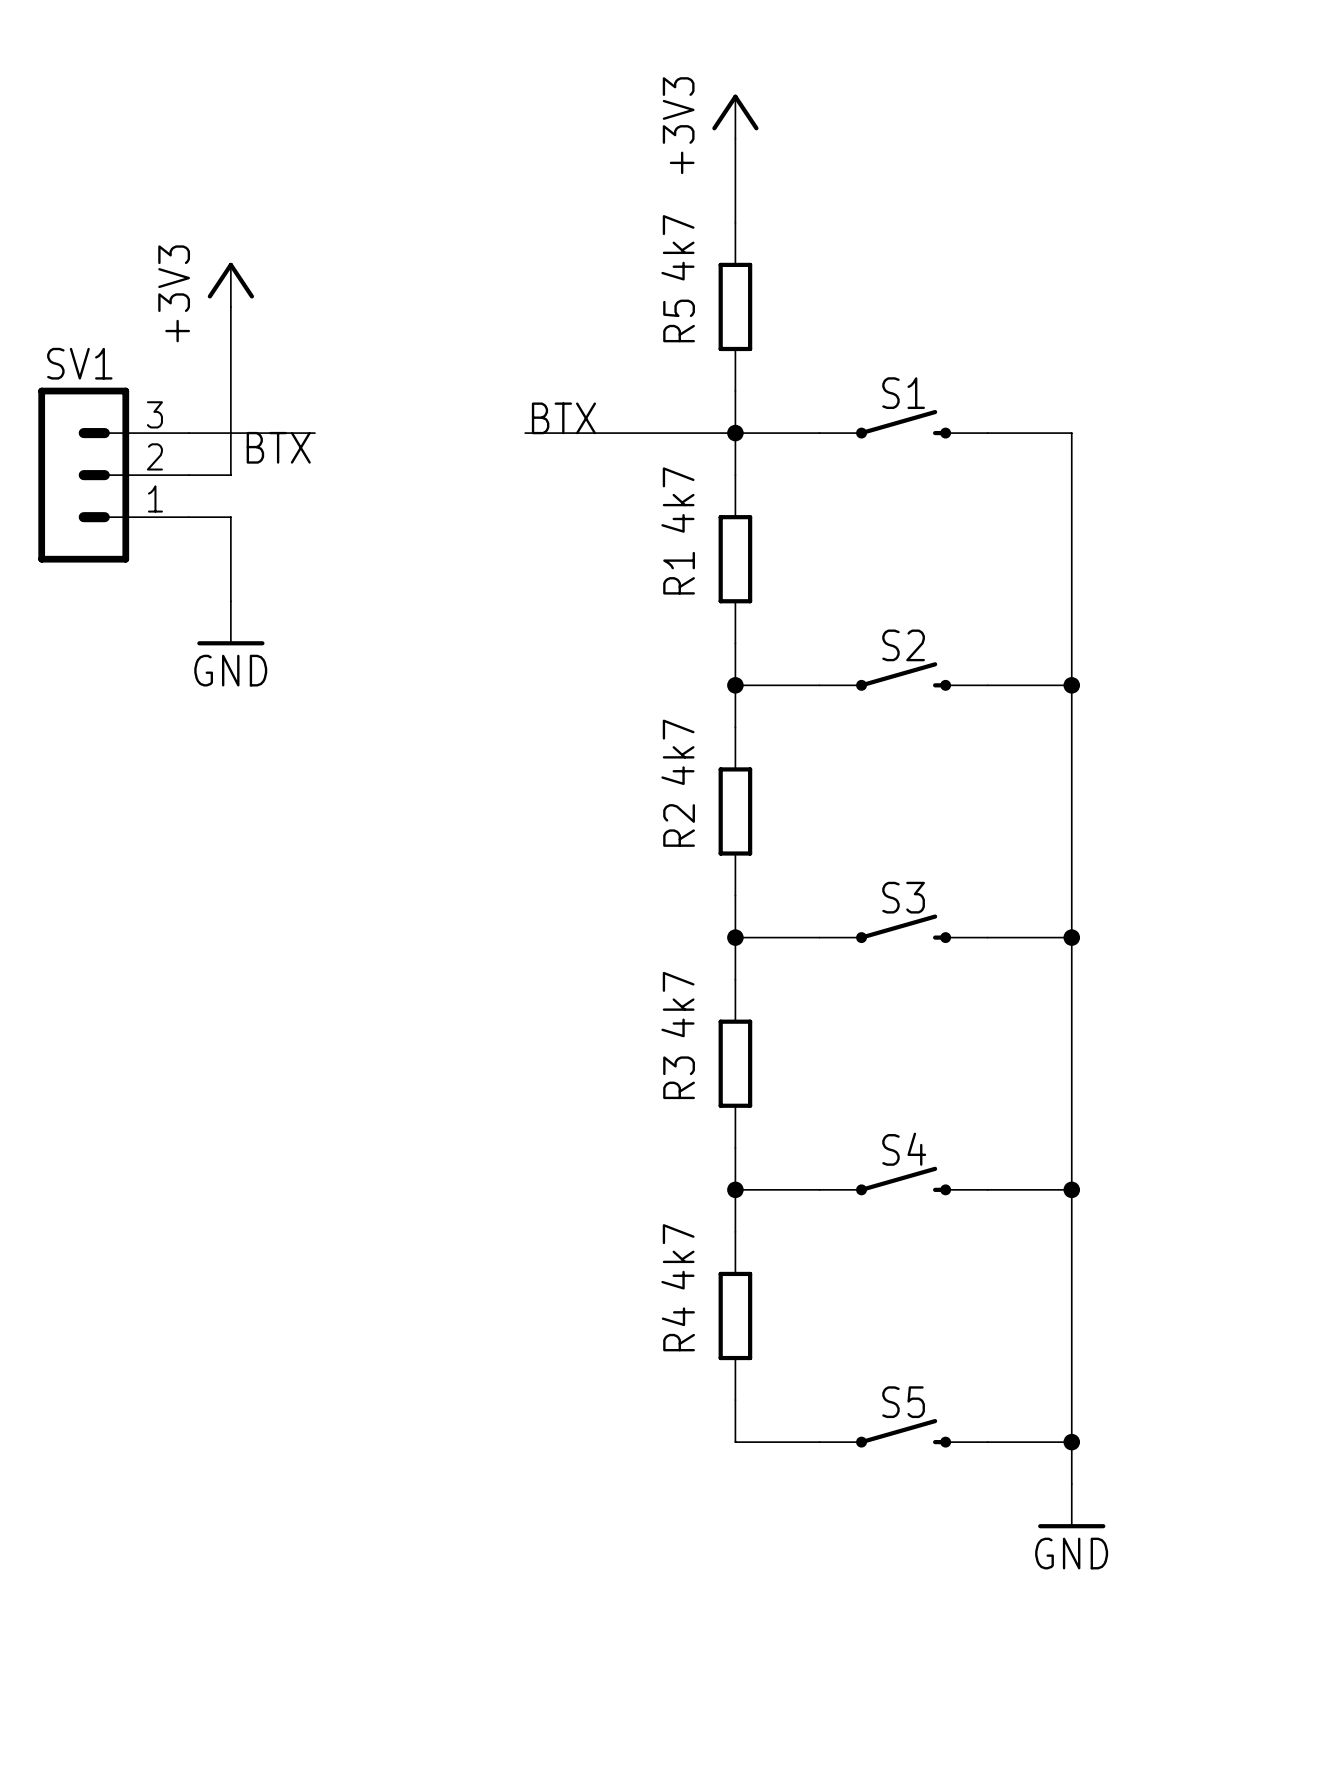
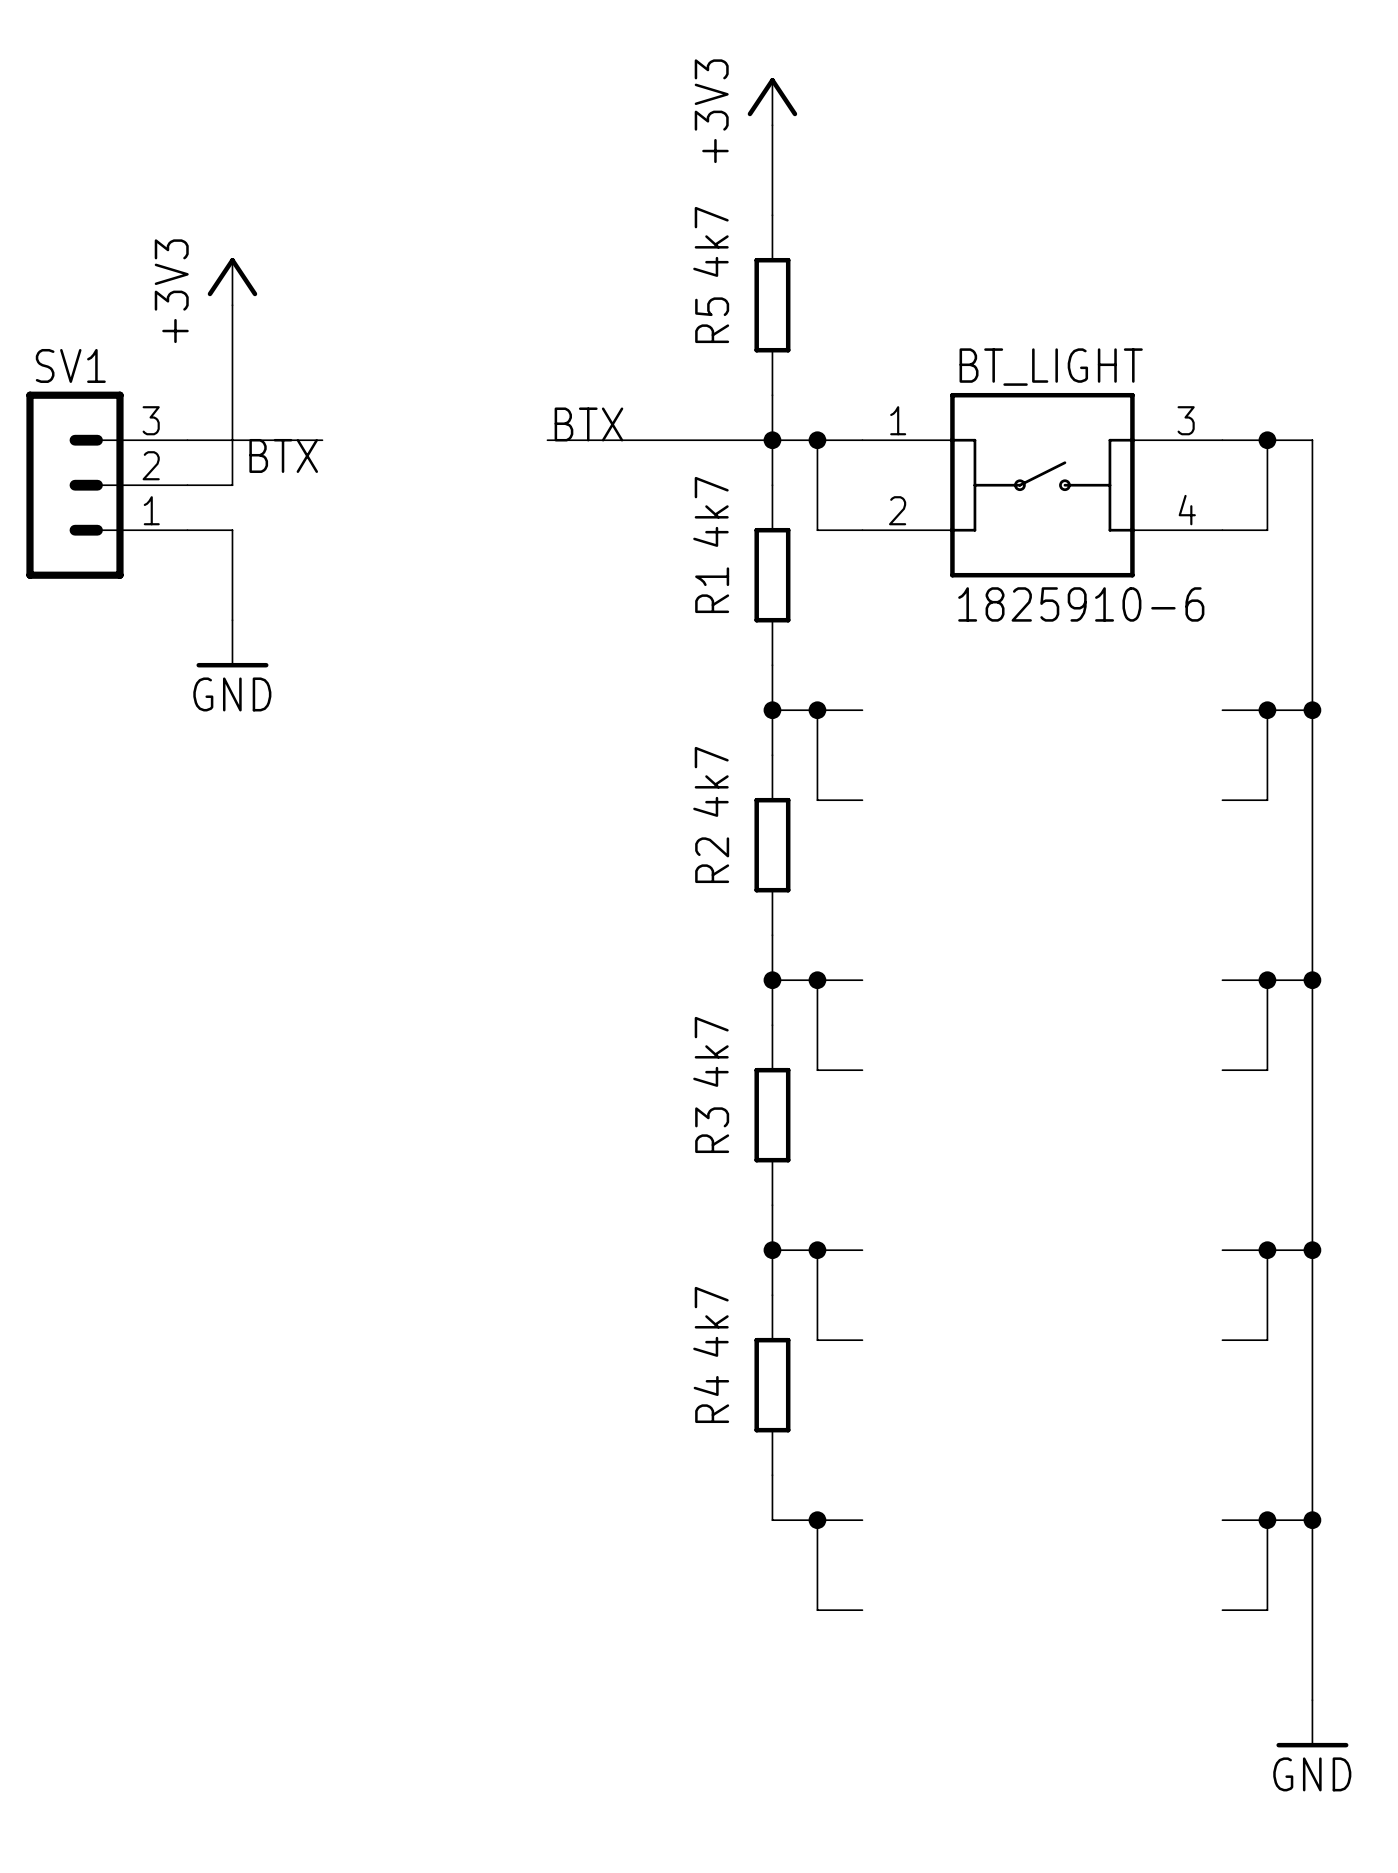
S1: (903, 424) -> none
wire: none -> (817, 440) (817, 530) (862, 530)
junction: none -> (817, 440)
wire: (987, 433) (1071, 433) (1071, 1484) -> none
wire: none -> (1222, 440) (1312, 440) (1312, 1700)
wire: none -> (1267, 440) (1267, 530) (1222, 530)
junction: none -> (1267, 440)
BT_LIGHT: none -> 1825910-6 (1042, 485)
S2: (903, 676) -> none
wire: none -> (817, 710) (817, 800) (862, 800)
junction: none -> (817, 710)
wire: (987, 685) (1071, 685) -> (1222, 710) (1312, 710)
junction: (1071, 685) -> none
wire: none -> (1267, 710) (1267, 800) (1222, 800)
junction: none -> (1267, 710)
junction: none -> (1312, 710)
S3: (903, 928) -> none
wire: none -> (817, 980) (817, 1070) (862, 1070)
junction: none -> (817, 980)
wire: (987, 937) (1071, 937) -> (1222, 980) (1312, 980)
junction: (1071, 937) -> none
wire: none -> (1267, 980) (1267, 1070) (1222, 1070)
junction: none -> (1267, 980)
junction: none -> (1312, 980)
S4: (903, 1181) -> none
wire: none -> (817, 1250) (817, 1340) (862, 1340)
junction: none -> (817, 1250)
wire: (987, 1189) (1071, 1189) -> (1222, 1250) (1312, 1250)
junction: (1071, 1189) -> none
wire: none -> (1267, 1250) (1267, 1340) (1222, 1340)
junction: none -> (1267, 1250)
junction: none -> (1312, 1250)
S5: (903, 1433) -> none
wire: none -> (817, 1520) (817, 1610) (862, 1610)
junction: none -> (817, 1520)
wire: (987, 1442) (1071, 1442) -> (1222, 1520) (1312, 1520)
junction: (1071, 1442) -> none
wire: none -> (1267, 1520) (1267, 1610) (1222, 1610)
junction: none -> (1267, 1520)
junction: none -> (1312, 1520)
power symbol position: GND (1071, 1506) -> GND (1312, 1723)

